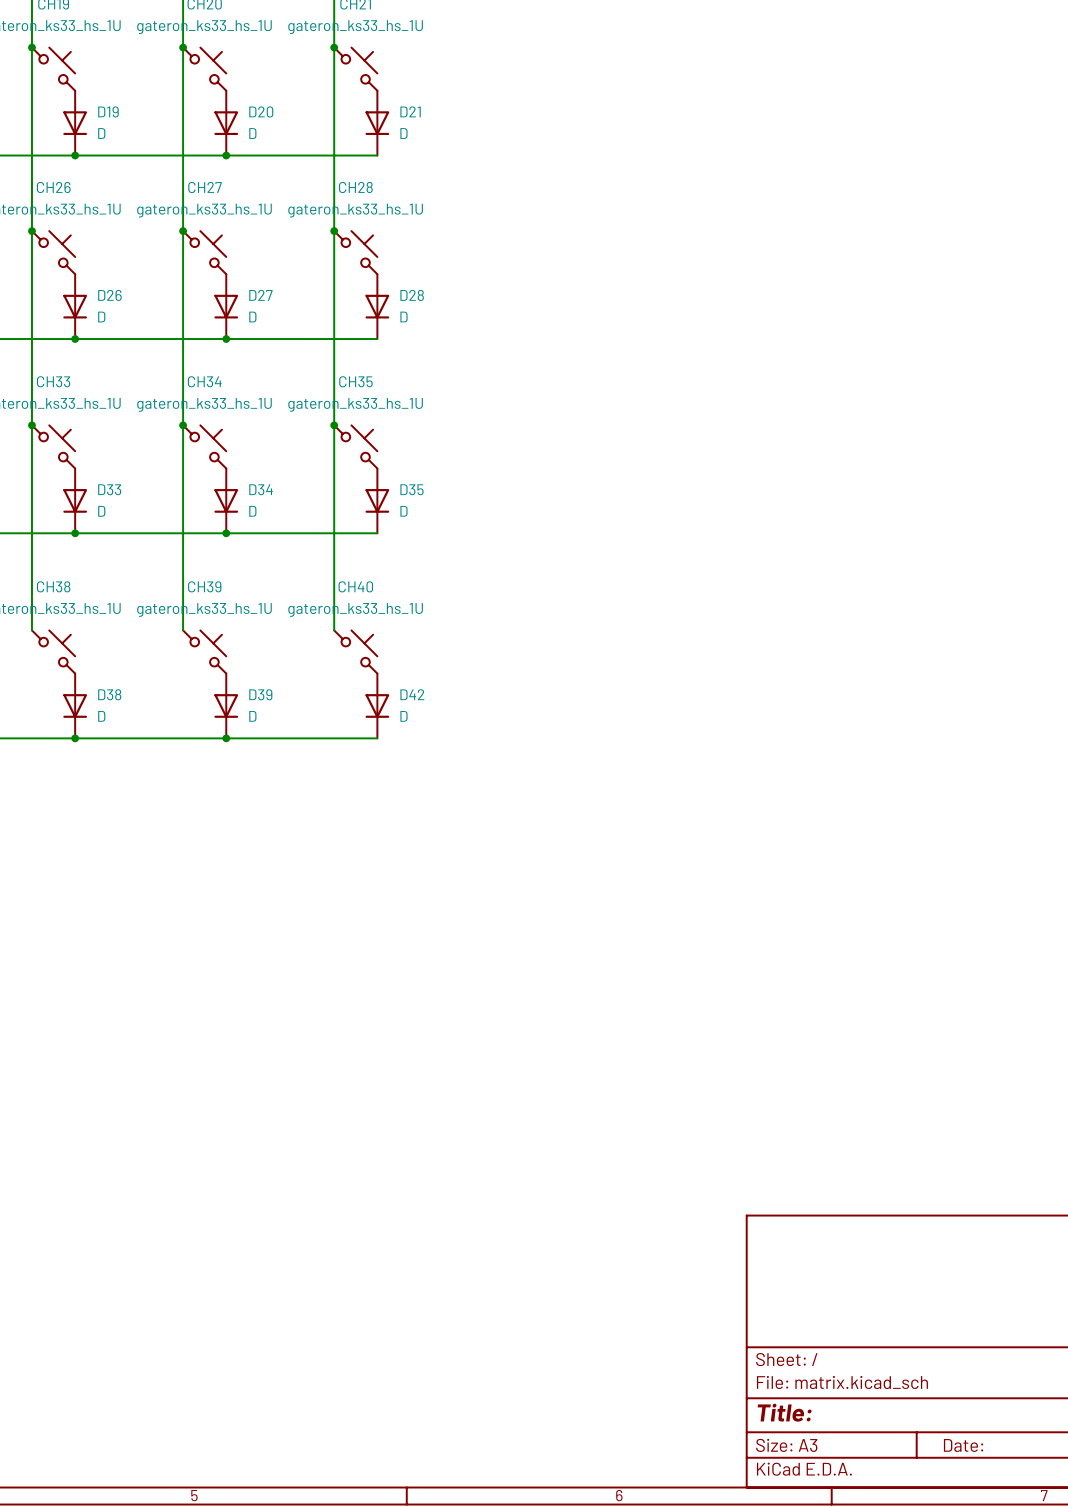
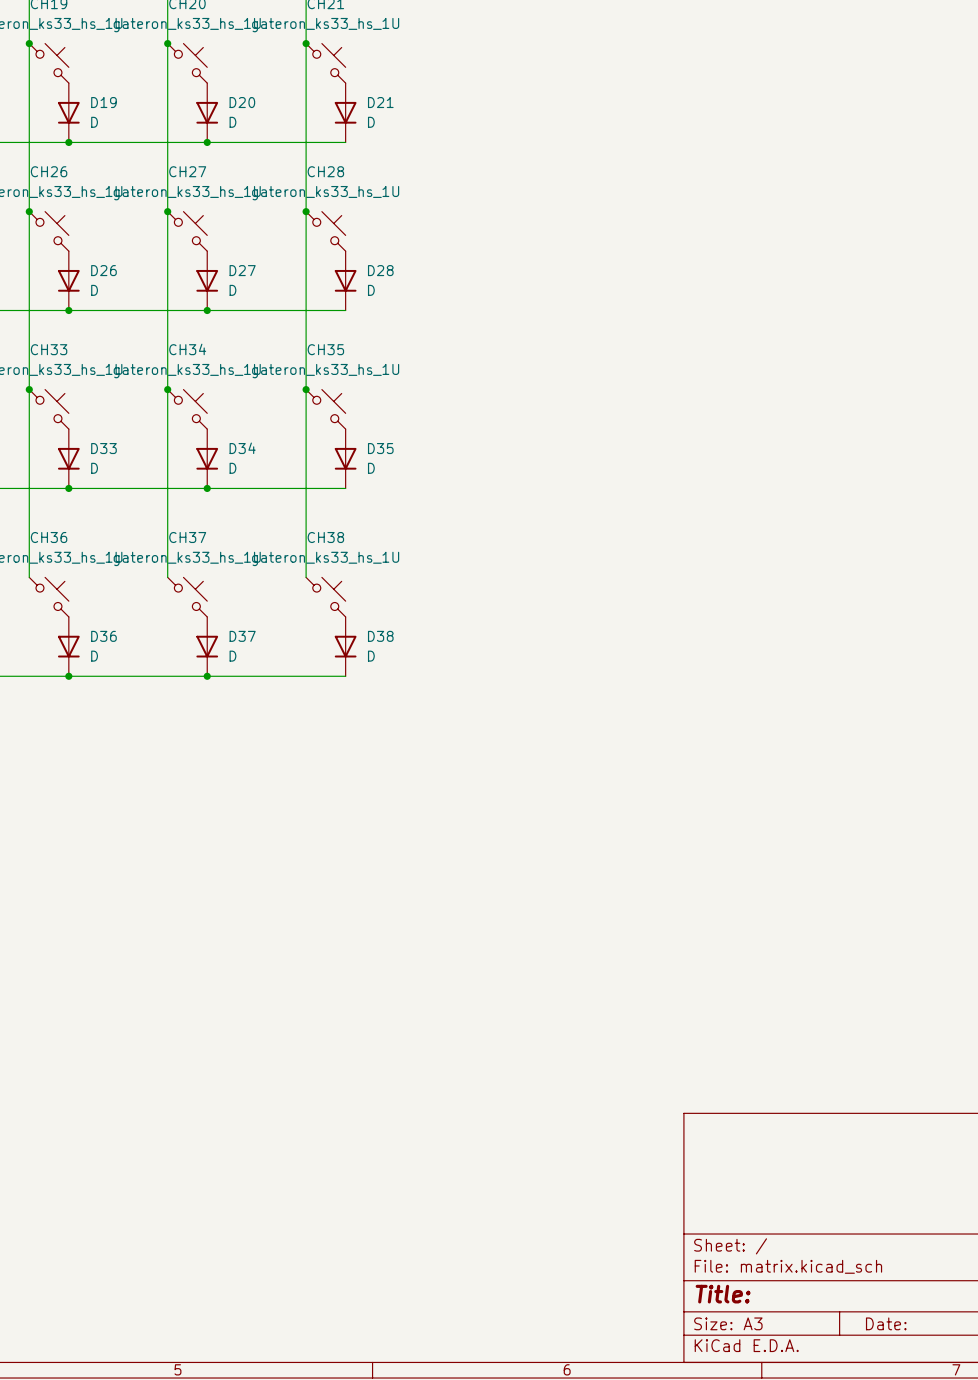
CH38 name: CH38 (53, 586) -> CH36 (49, 537)
CH39 name: CH39 (204, 586) -> CH37 (187, 537)
CH40 name: CH40 (355, 586) -> CH38 (325, 537)
D38 name: D38 (109, 694) -> D36 (103, 636)
D39 name: D39 (260, 694) -> D37 (242, 636)
D42 name: D42 (412, 694) -> D38 (380, 636)

